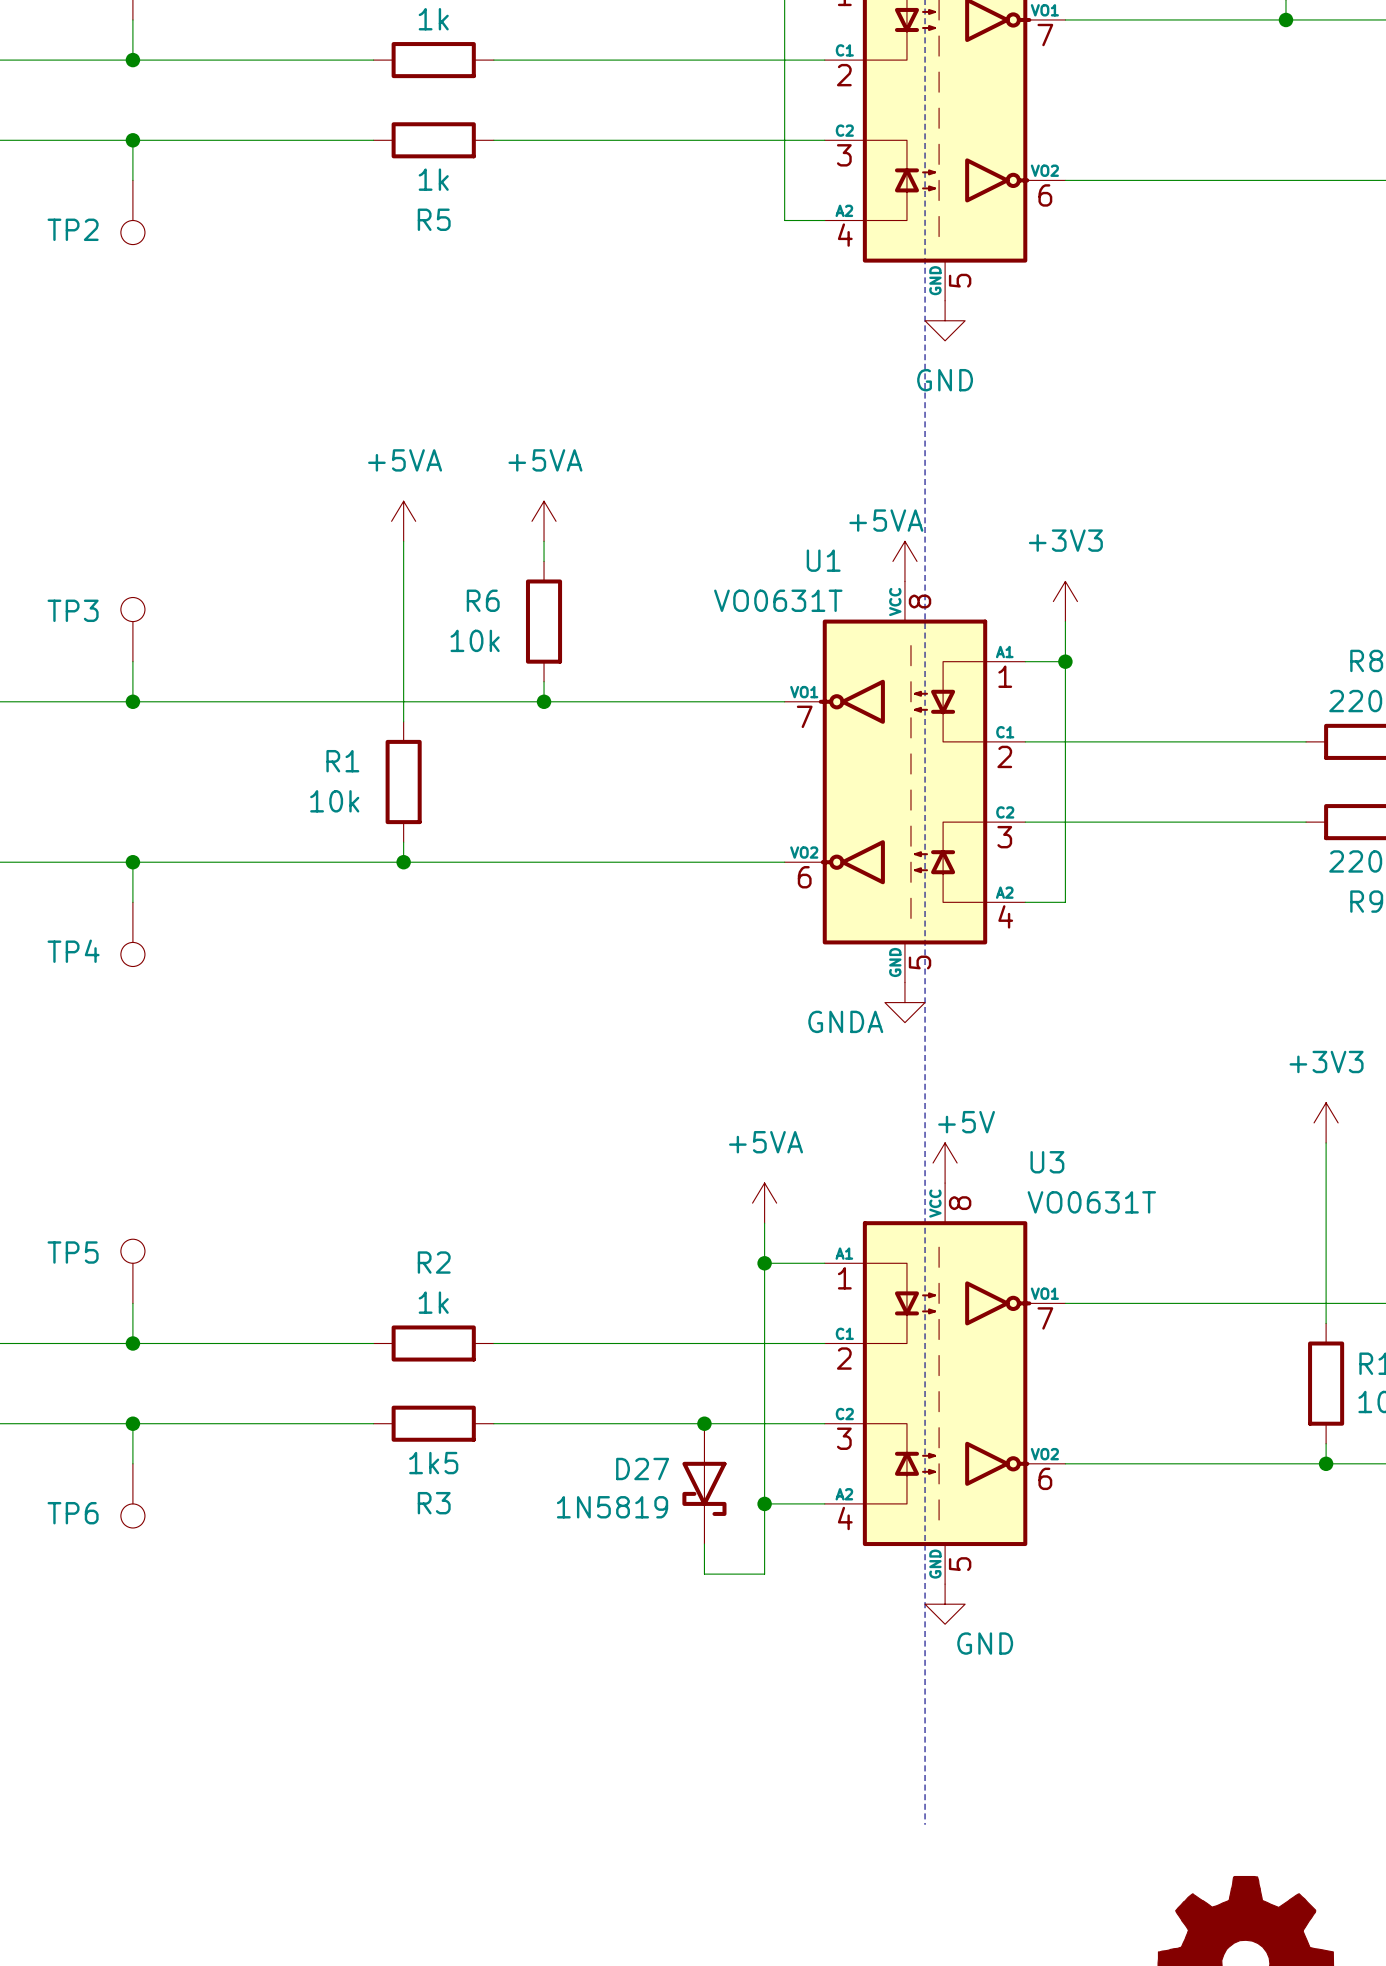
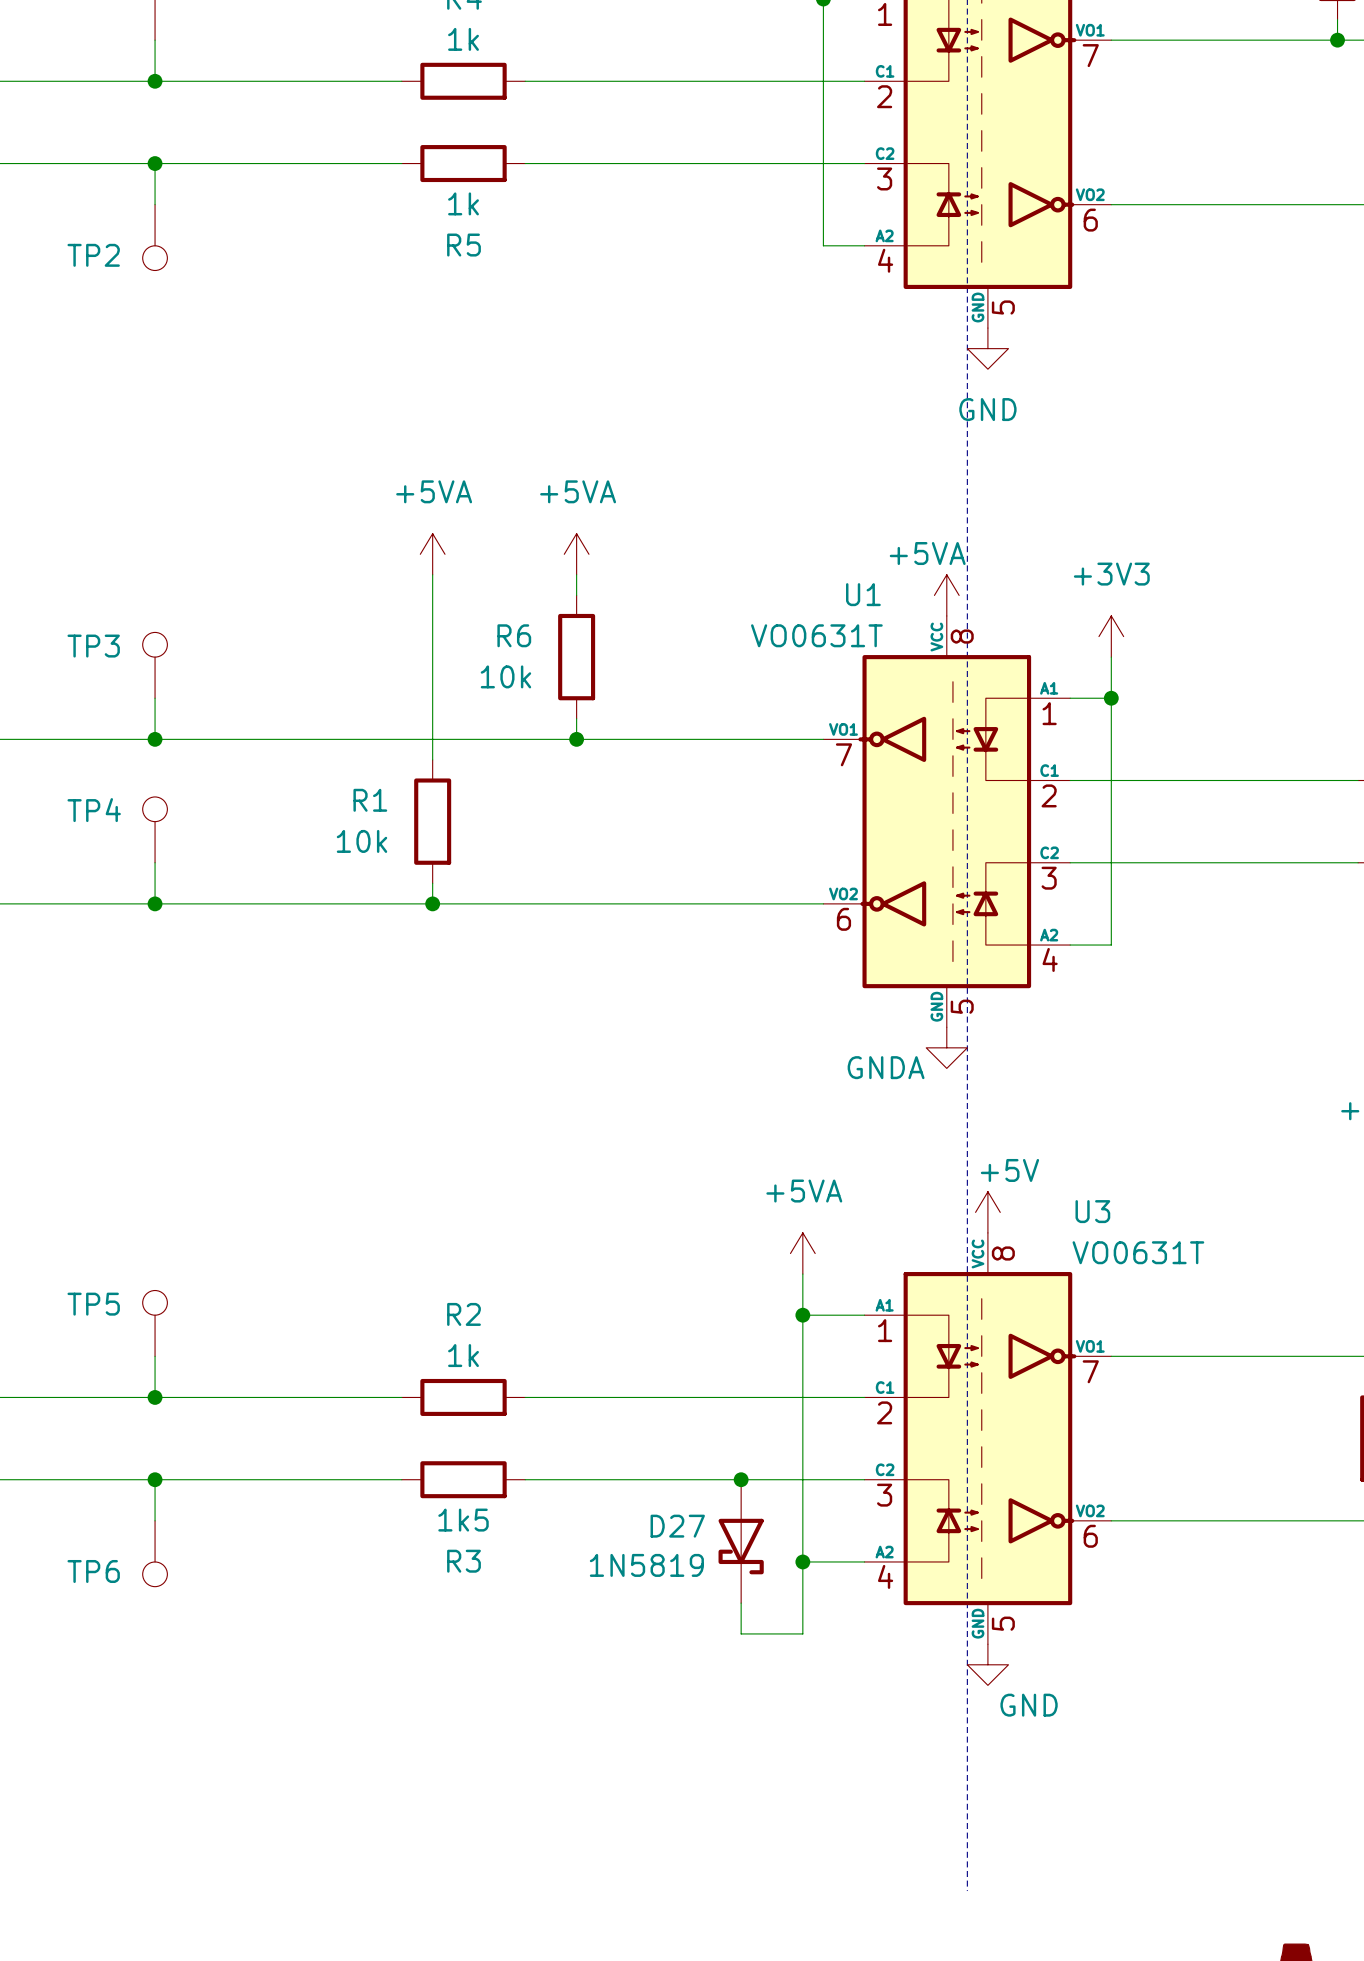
wire: (132, 862) (132, 902) -> (155, 903) (155, 862)
TP4 position: (132, 934) -> (155, 829)
TP4 name position: TP4 (73, 951) -> TP4 (94, 810)
TP4 rotation: 0° (132, 954) -> 180° (155, 809)

